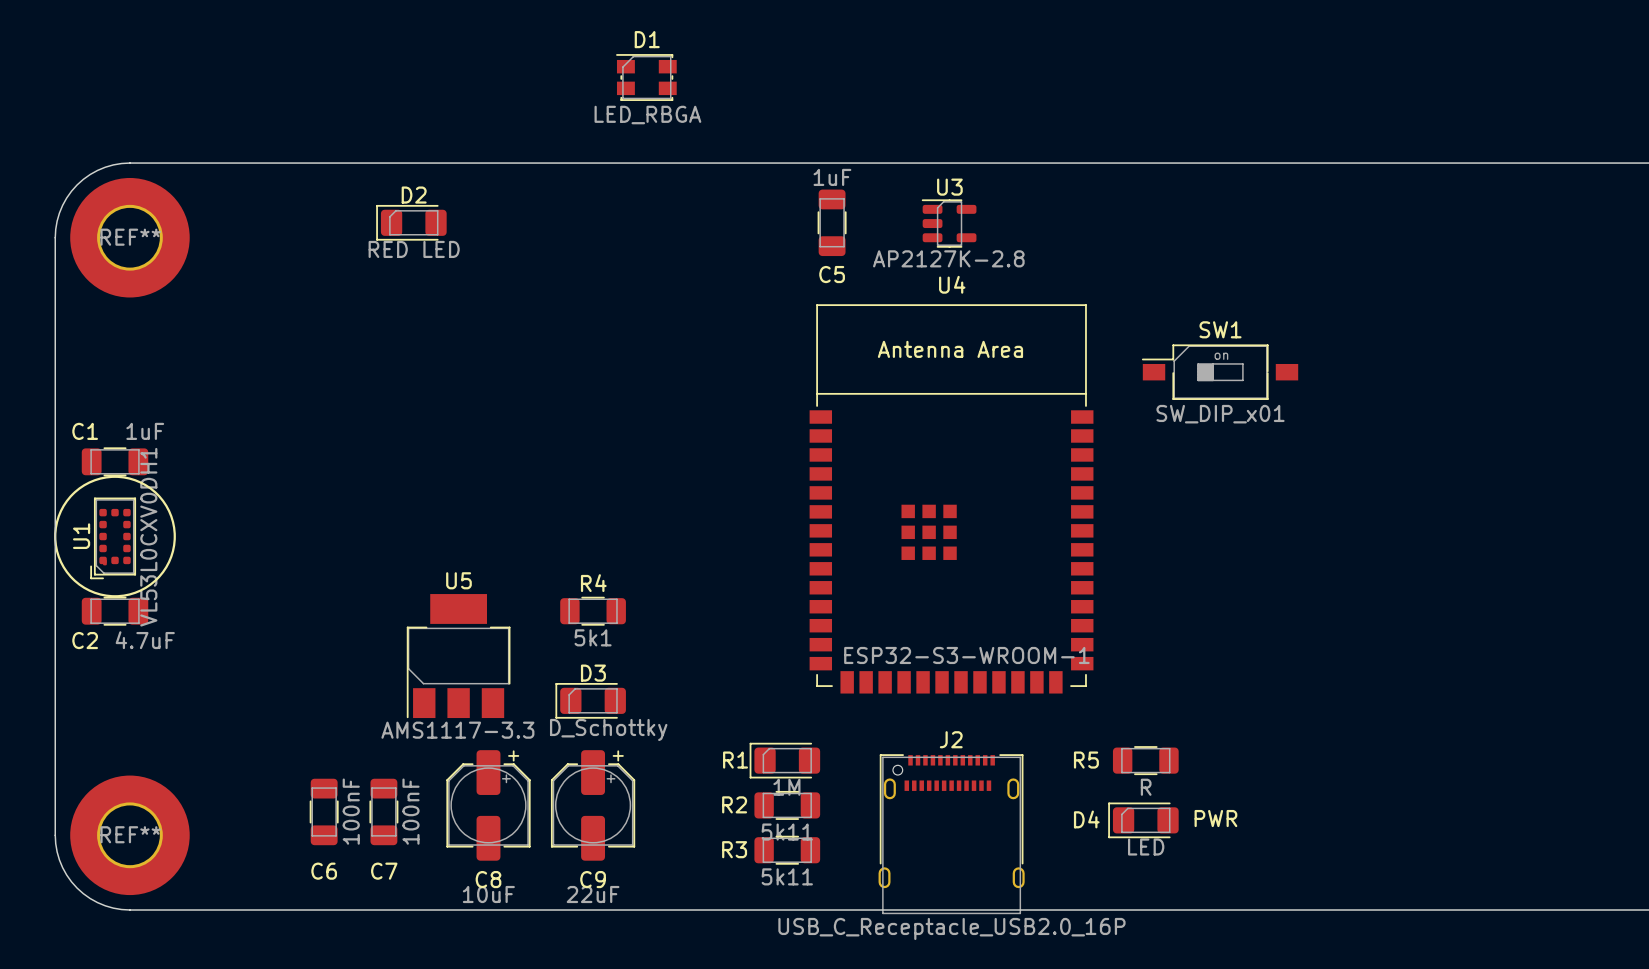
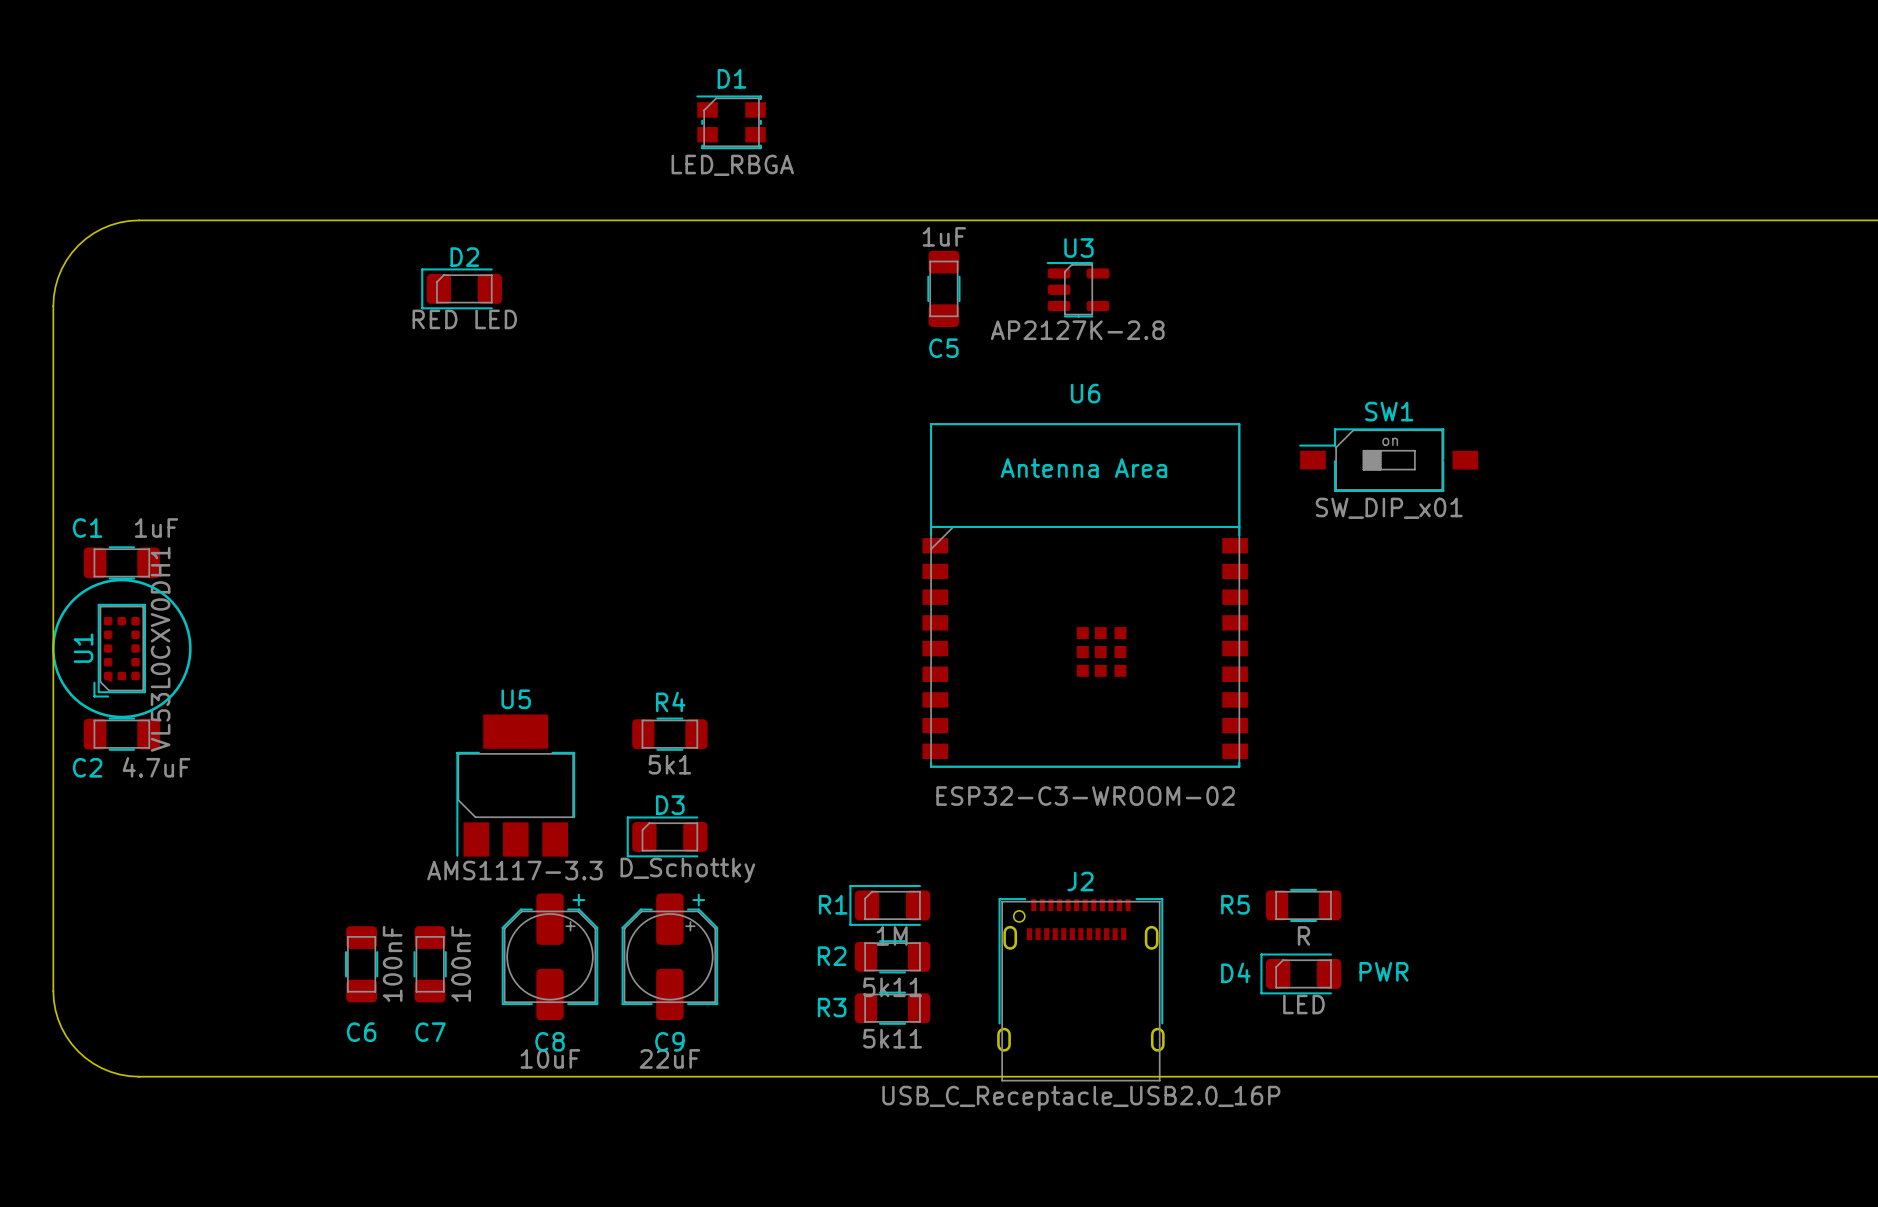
REF**: (129, 237) -> none
U6: none -> ESP32-C3-WROOM-02 (1085, 595)
U4: ESP32-S3-WROOM-1 (951, 498) -> none
REF**: (129, 835) -> none

